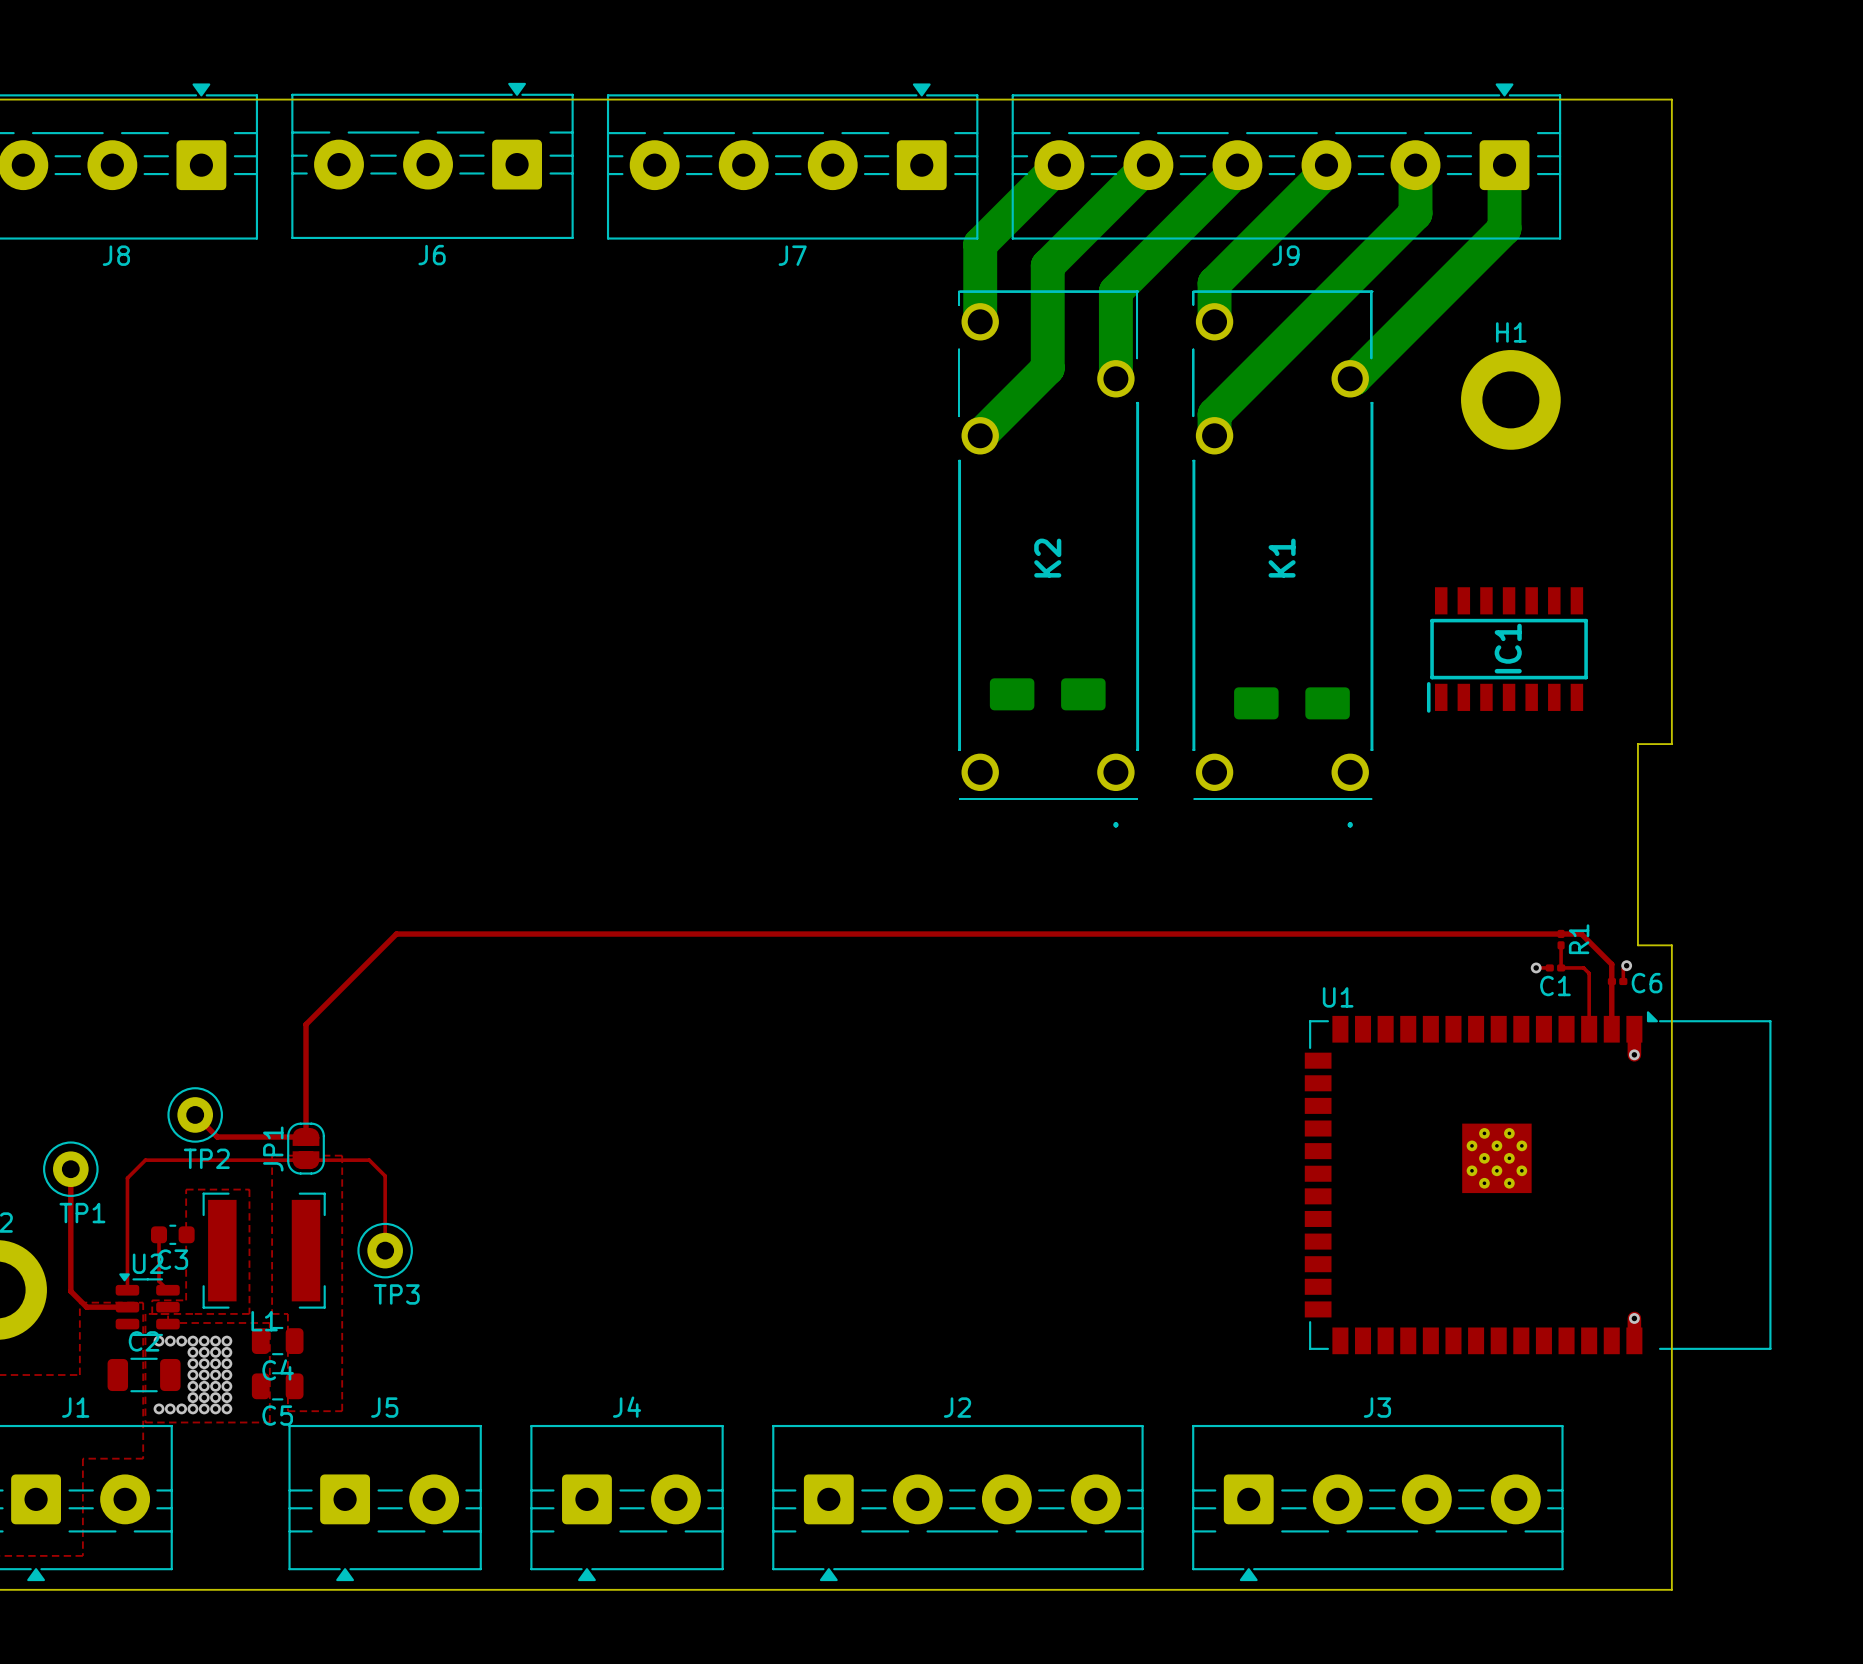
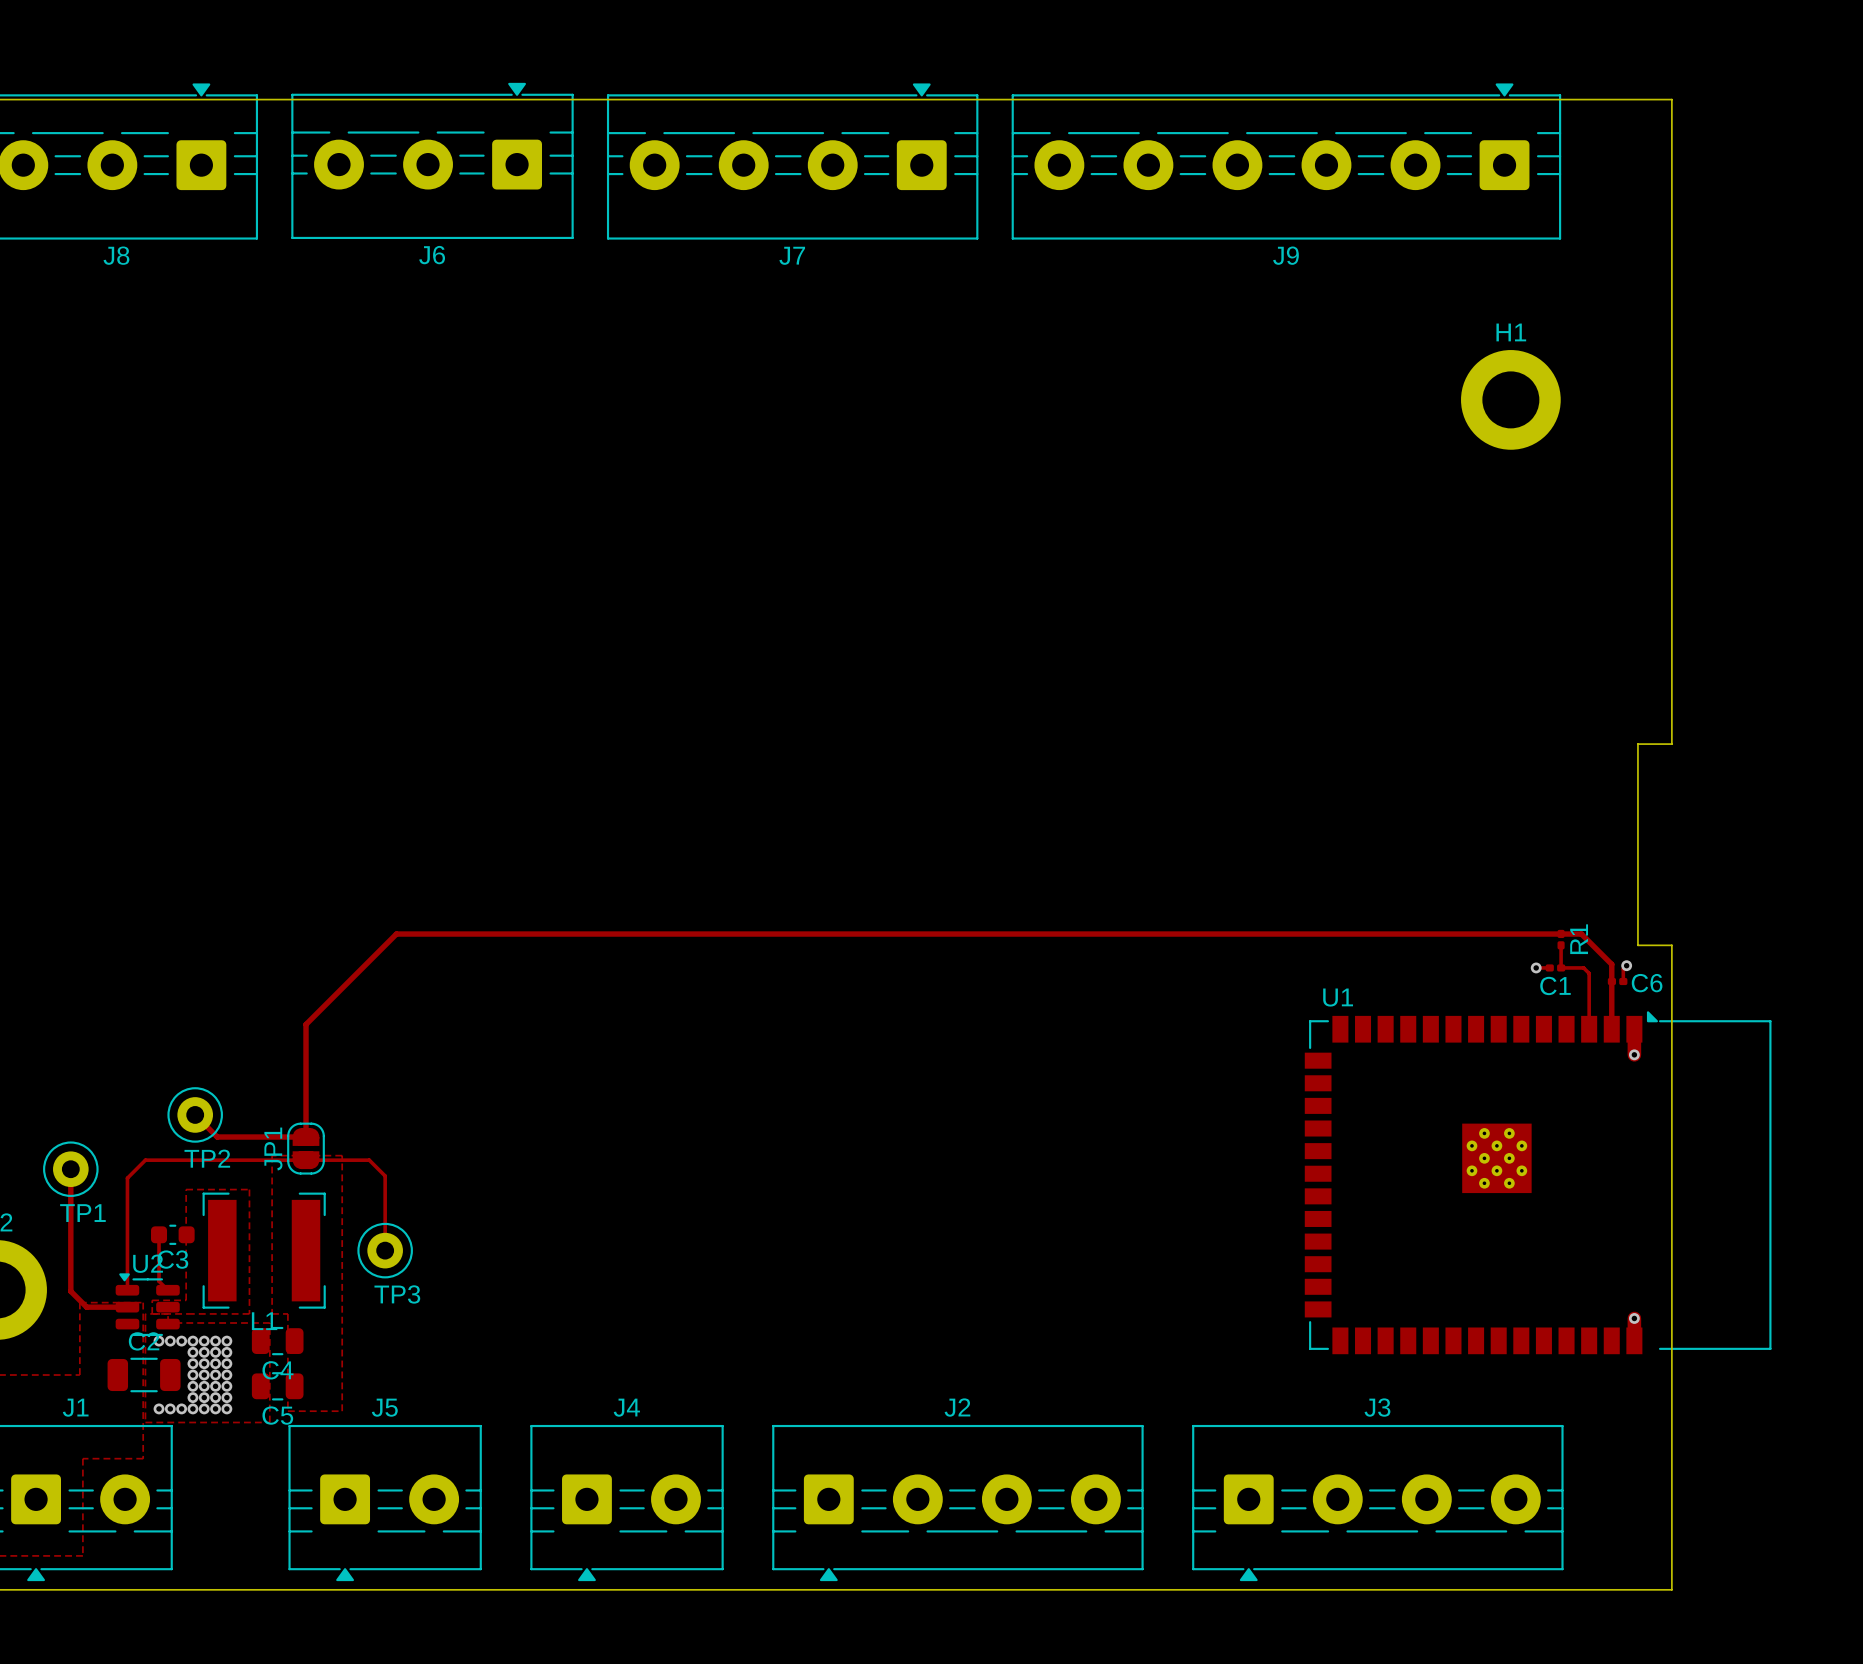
bottom track: (1059, 165) (980, 244) (980, 321) -> none
bottom track: (1148, 165) (1047, 265) (1047, 368) (980, 435) -> none
bottom track: (1237, 165) (1237, 169) (1115, 291) (1115, 378) -> none
bottom track: (1326, 165) (1326, 171) (1214, 283) (1214, 321) -> none
bottom track: (1415, 165) (1415, 213) (1214, 414) (1214, 435) -> none
bottom track: (1504, 165) (1504, 228) (1354, 378) (1350, 378) -> none
K2: (1048, 559) -> none
K1: (1282, 559) -> none
IC1: (1507, 649) -> none
part: (1047, 694) -> none
part: (1291, 703) -> none

